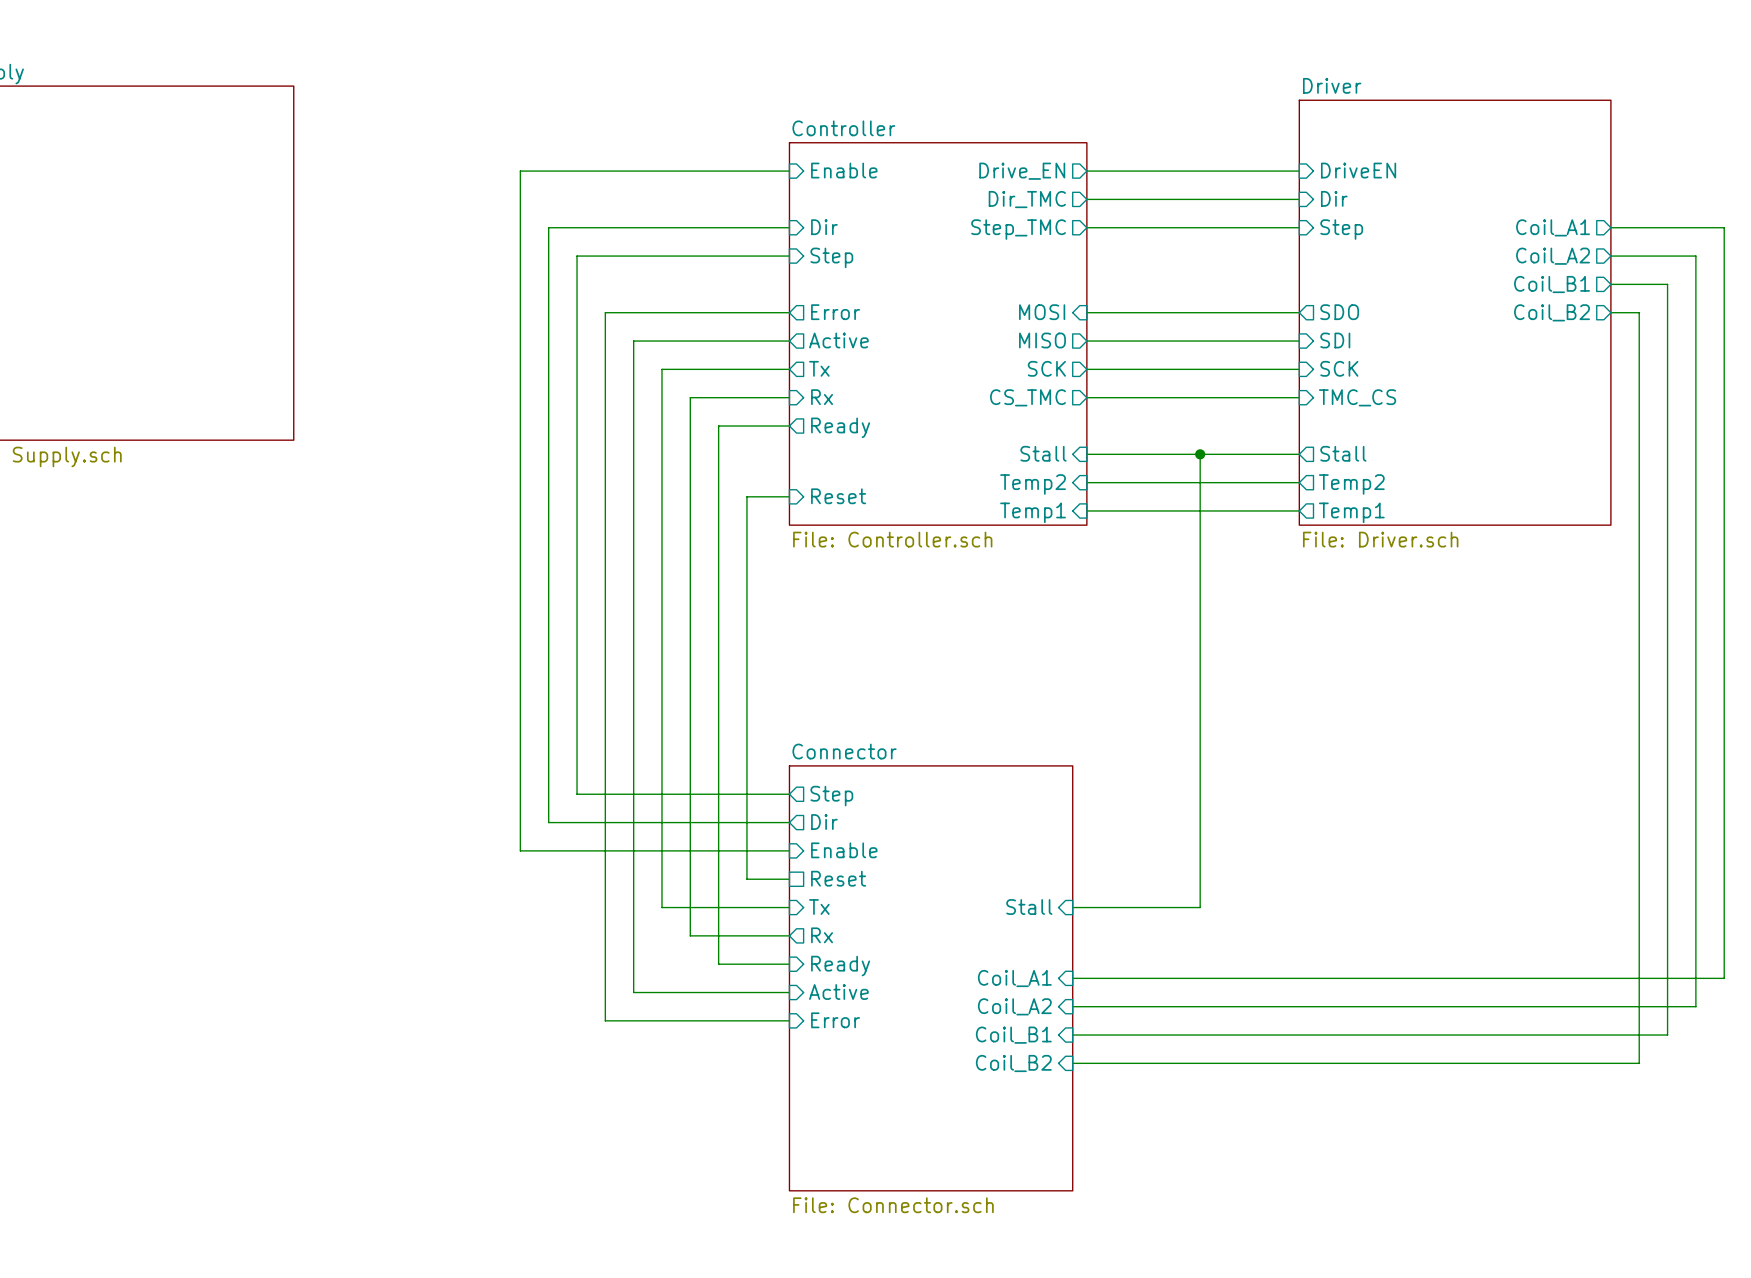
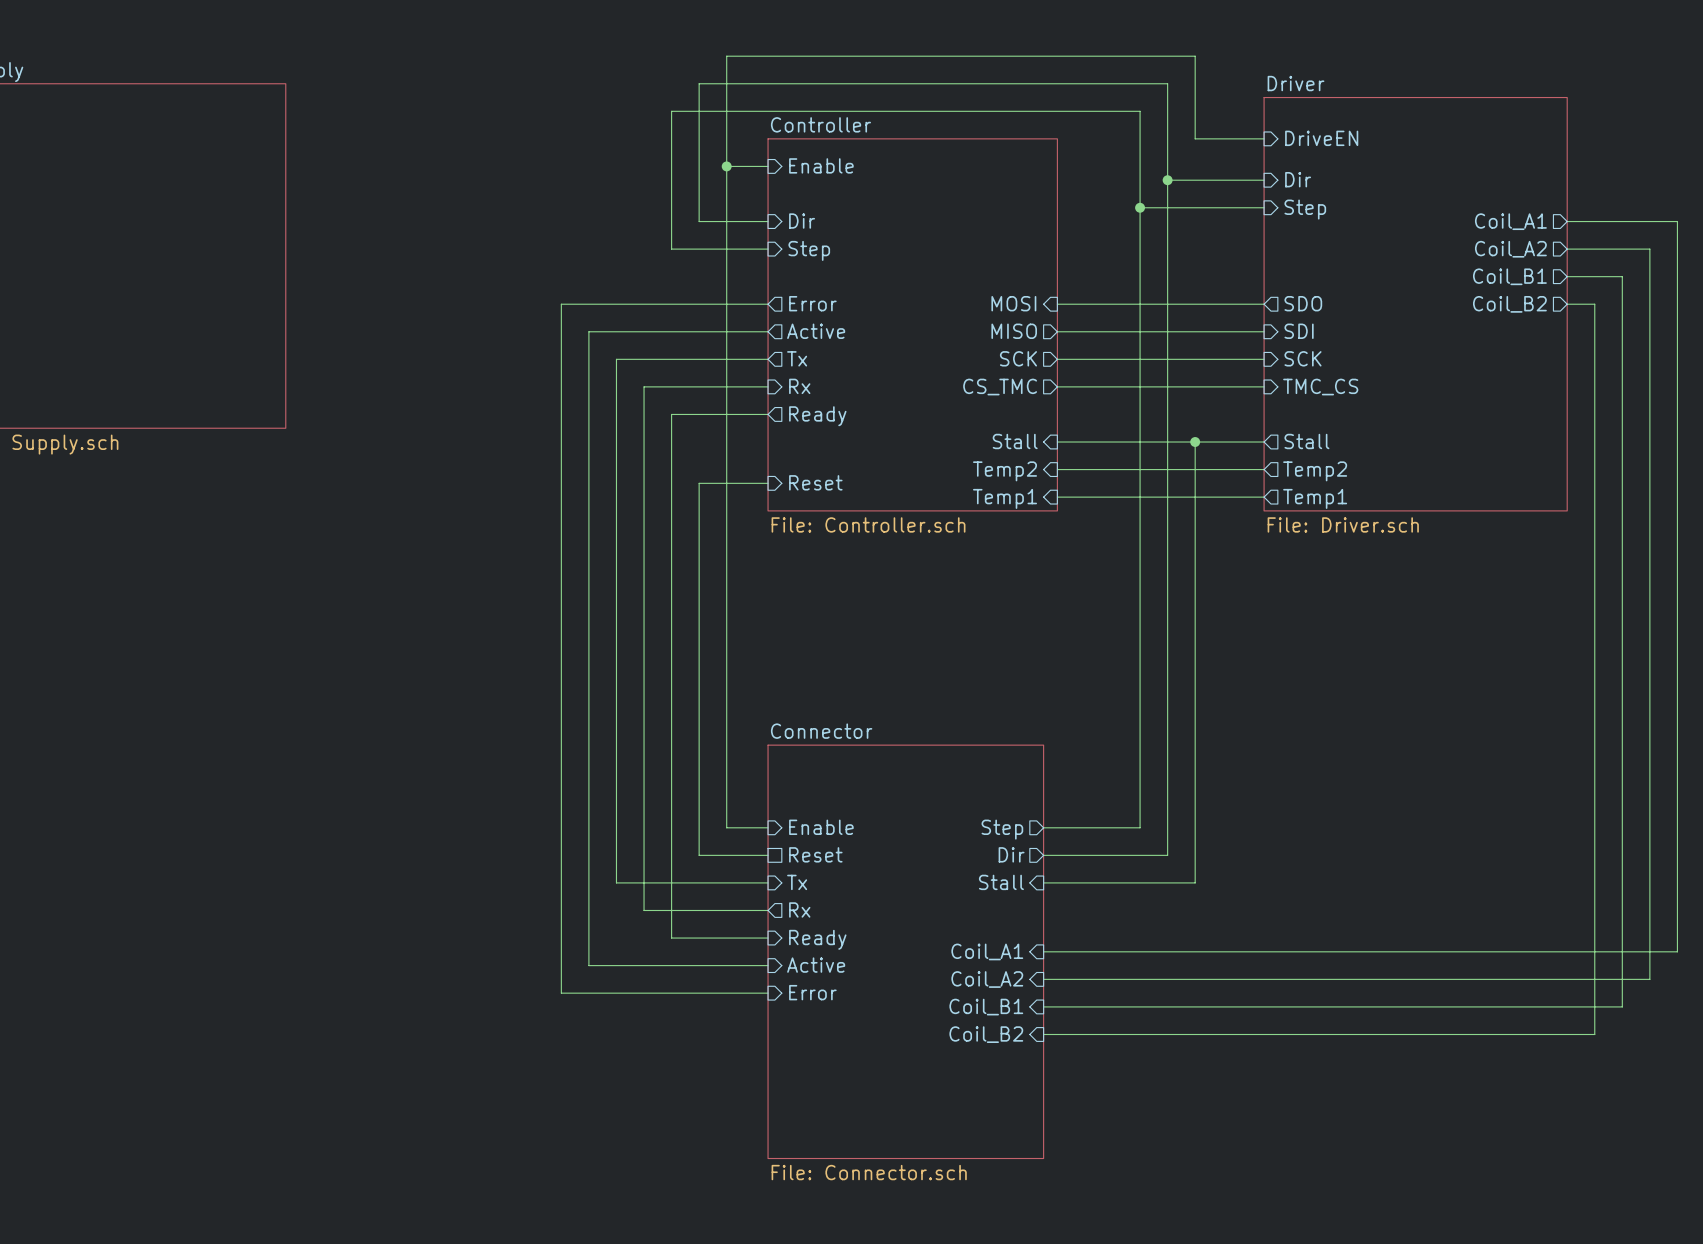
wire: none -> (1264, 138) (1195, 138) (1195, 56) (726, 56) (726, 483) (699, 483)
sheet pin position: DriveEN (1358, 170) -> DriveEN (1321, 138)
wire: (746, 171) (520, 171) (520, 850) (746, 850) (746, 879) -> none
junction: none -> (726, 166)
sheet pin: Drive_EN (1022, 171) -> none
wire: (1086, 171) (1299, 171) -> none
wire: none -> (1167, 180) (1264, 180)
junction: none -> (1167, 180)
sheet pin position: Dir (1334, 198) -> Dir (1298, 179)
sheet pin: Dir_TMC (1027, 199) -> none
wire: (1086, 199) (1299, 199) -> none
wire: none -> (1140, 207) (1264, 207)
junction: none -> (1140, 207)
wire: (718, 227) (548, 227) (548, 822) (789, 822) -> (699, 221) (699, 83) (1167, 83) (1167, 442)
wire: (1086, 227) (1299, 227) -> none
sheet pin: Step_TMC (1018, 229) -> none
sheet pin position: Step (1341, 229) -> Step (1305, 209)
wire: (690, 256) (577, 256) (577, 312) -> (588, 304) (561, 304)
wire: none -> (671, 249) (671, 111) (1140, 111) (1140, 827) (1043, 827)
wire: (605, 312) (605, 341) -> (616, 331) (588, 331)
wire: (633, 341) (633, 369) -> none
wire: (661, 369) (661, 397) -> (644, 359) (616, 359)
wire: (690, 397) (690, 426) -> (671, 386) (644, 386)
wire: (718, 426) (718, 496) -> (699, 414) (671, 414)
junction position: (1200, 454) -> (1195, 442)
wire: none -> (1195, 442) (1195, 882) (1167, 882)
wire: (577, 794) (789, 794) -> (561, 772) (561, 993) (588, 993)
sheet pin rotation: 0° (831, 796) -> 180° (1002, 829)
sheet pin position: Step (831, 796) -> Step (1002, 829)
sheet pin rotation: 0° (824, 822) -> 180° (1011, 854)
sheet pin position: Dir (824, 822) -> Dir (1011, 854)
wire: (718, 879) (718, 964) -> (699, 855) (726, 855)
wire: (1200, 879) (1200, 907) -> (1167, 855) (1043, 855)
wire: (633, 907) (633, 992) -> (616, 882) (644, 882) (644, 910) (671, 910) (671, 938) (699, 938)
wire: (605, 992) (605, 1020) -> (588, 965) (616, 965)

